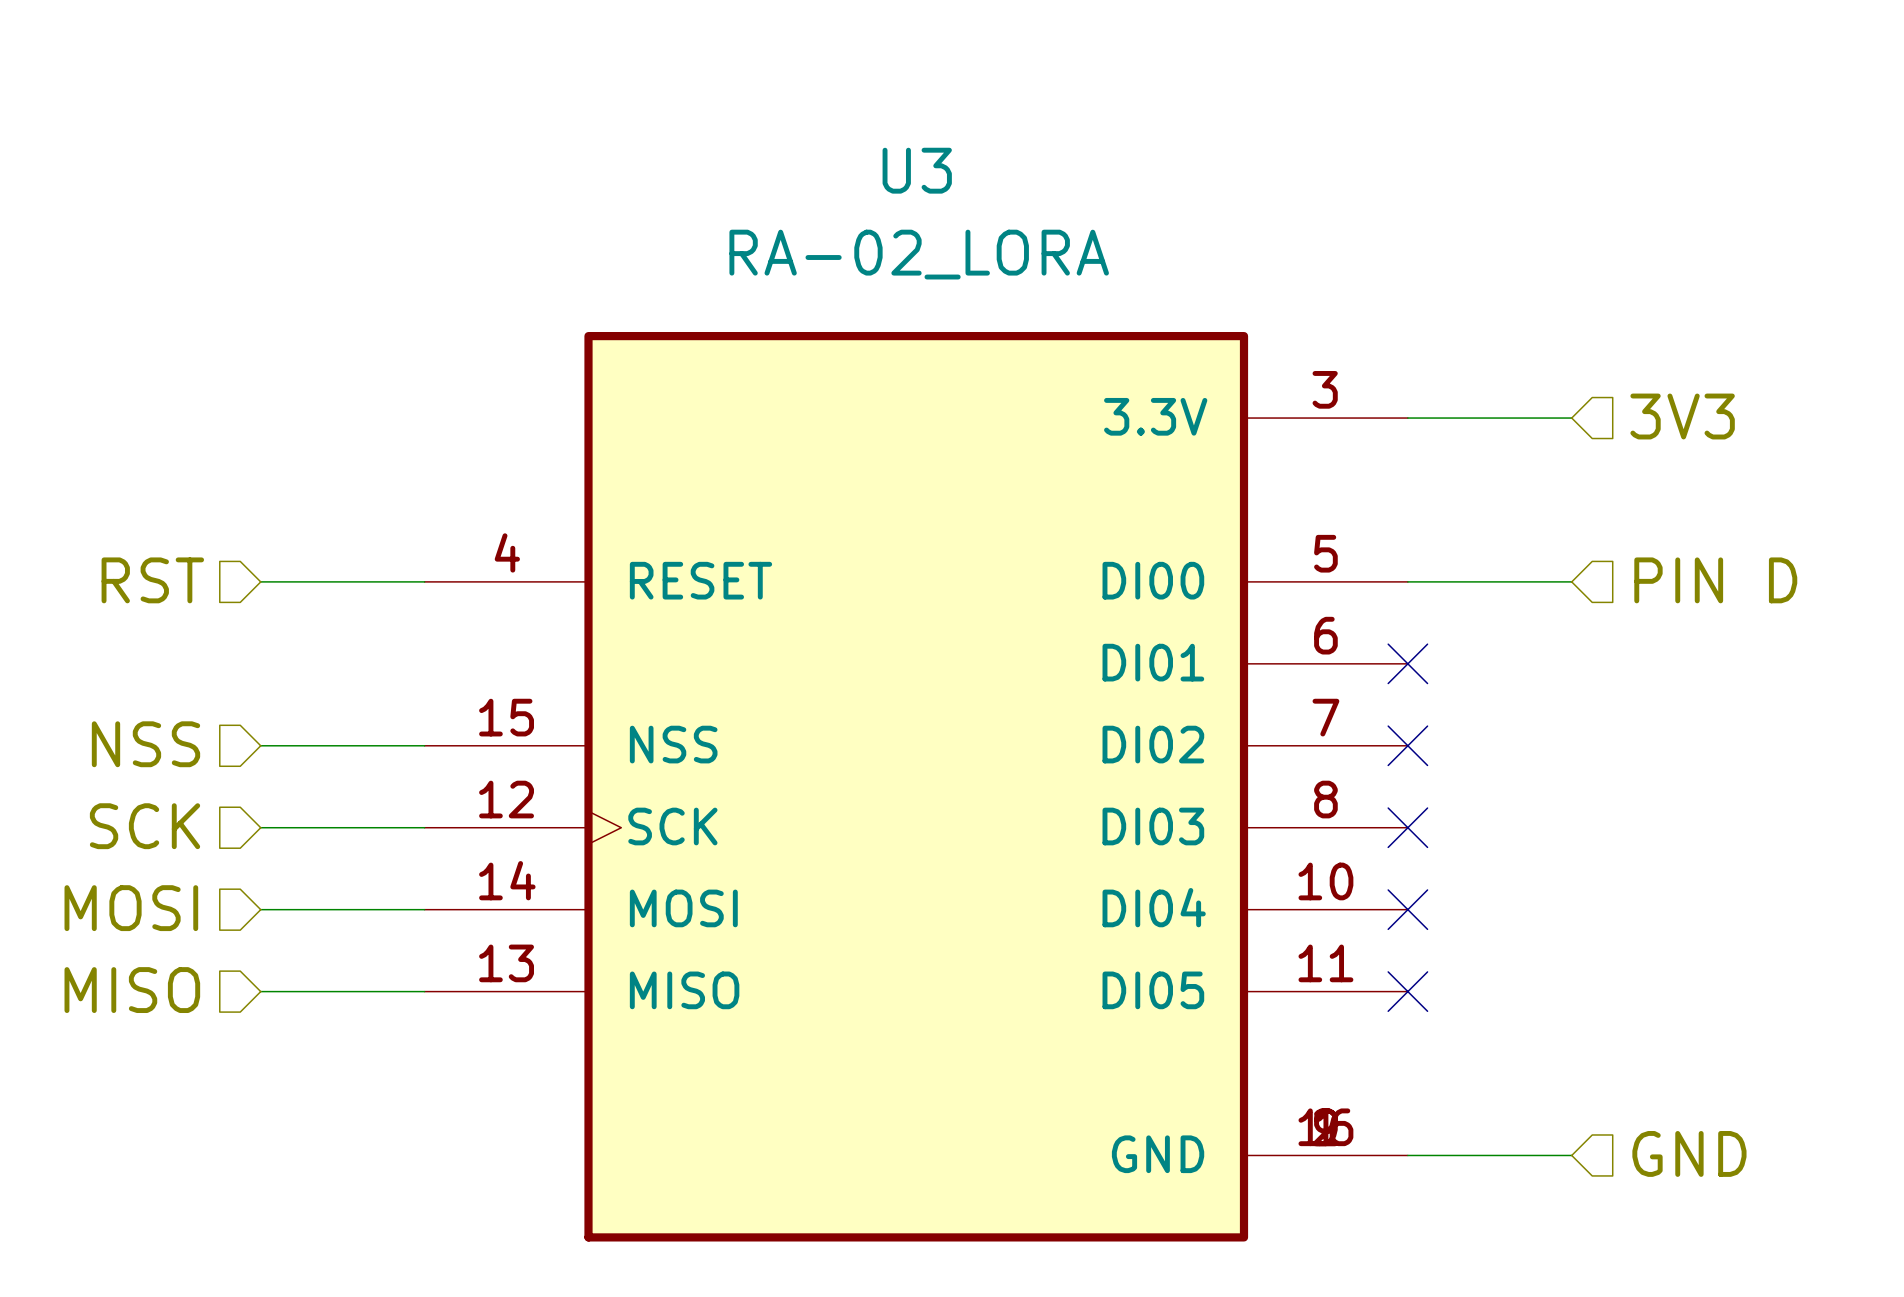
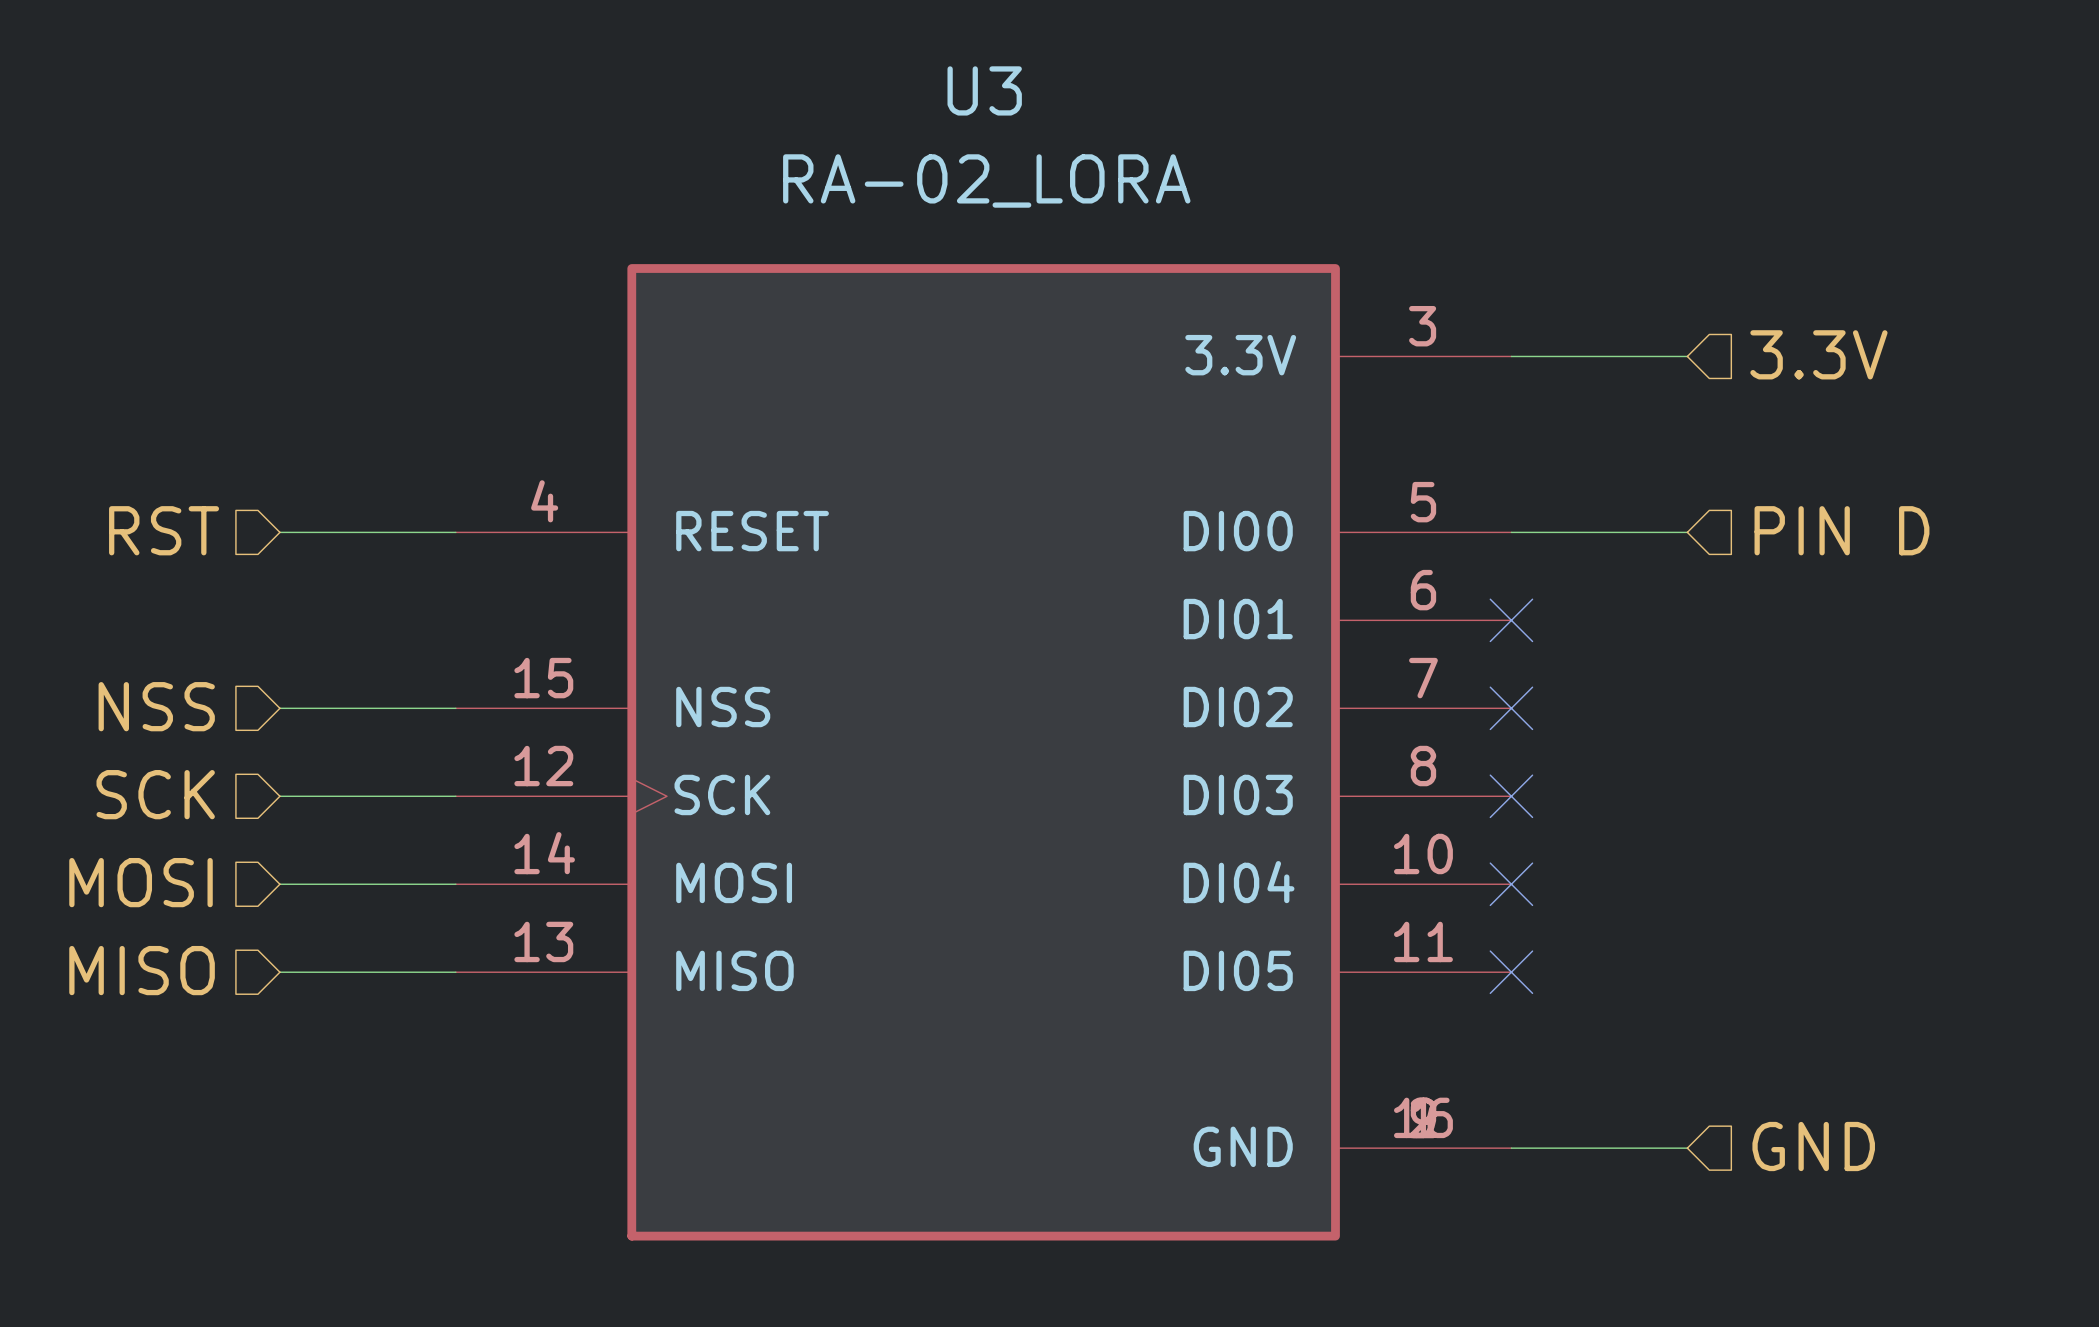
hierarchical label: 3V3 (1682, 416) -> 3.3V (1818, 354)

